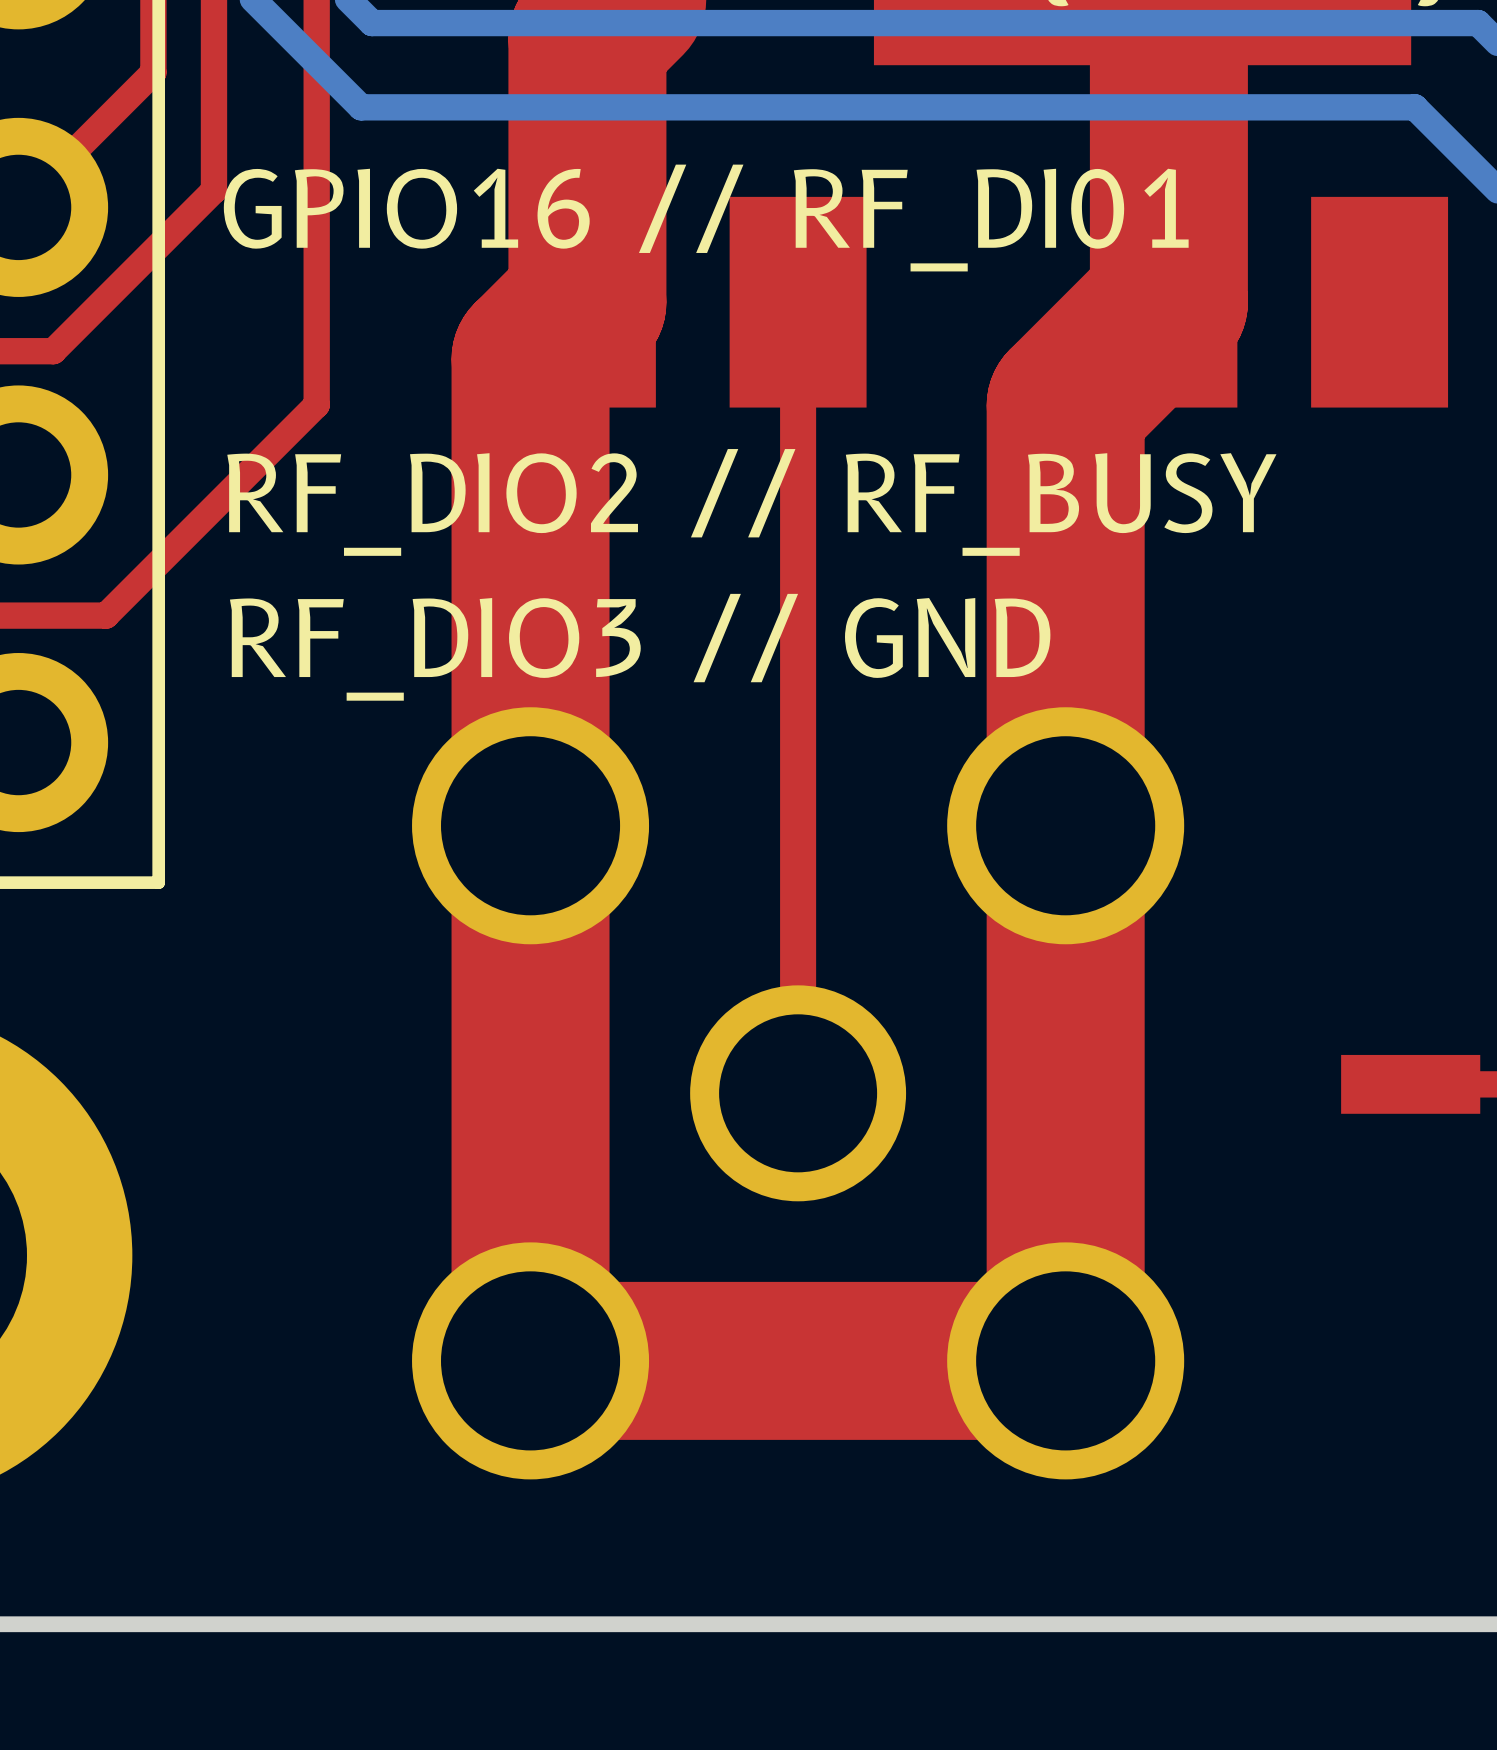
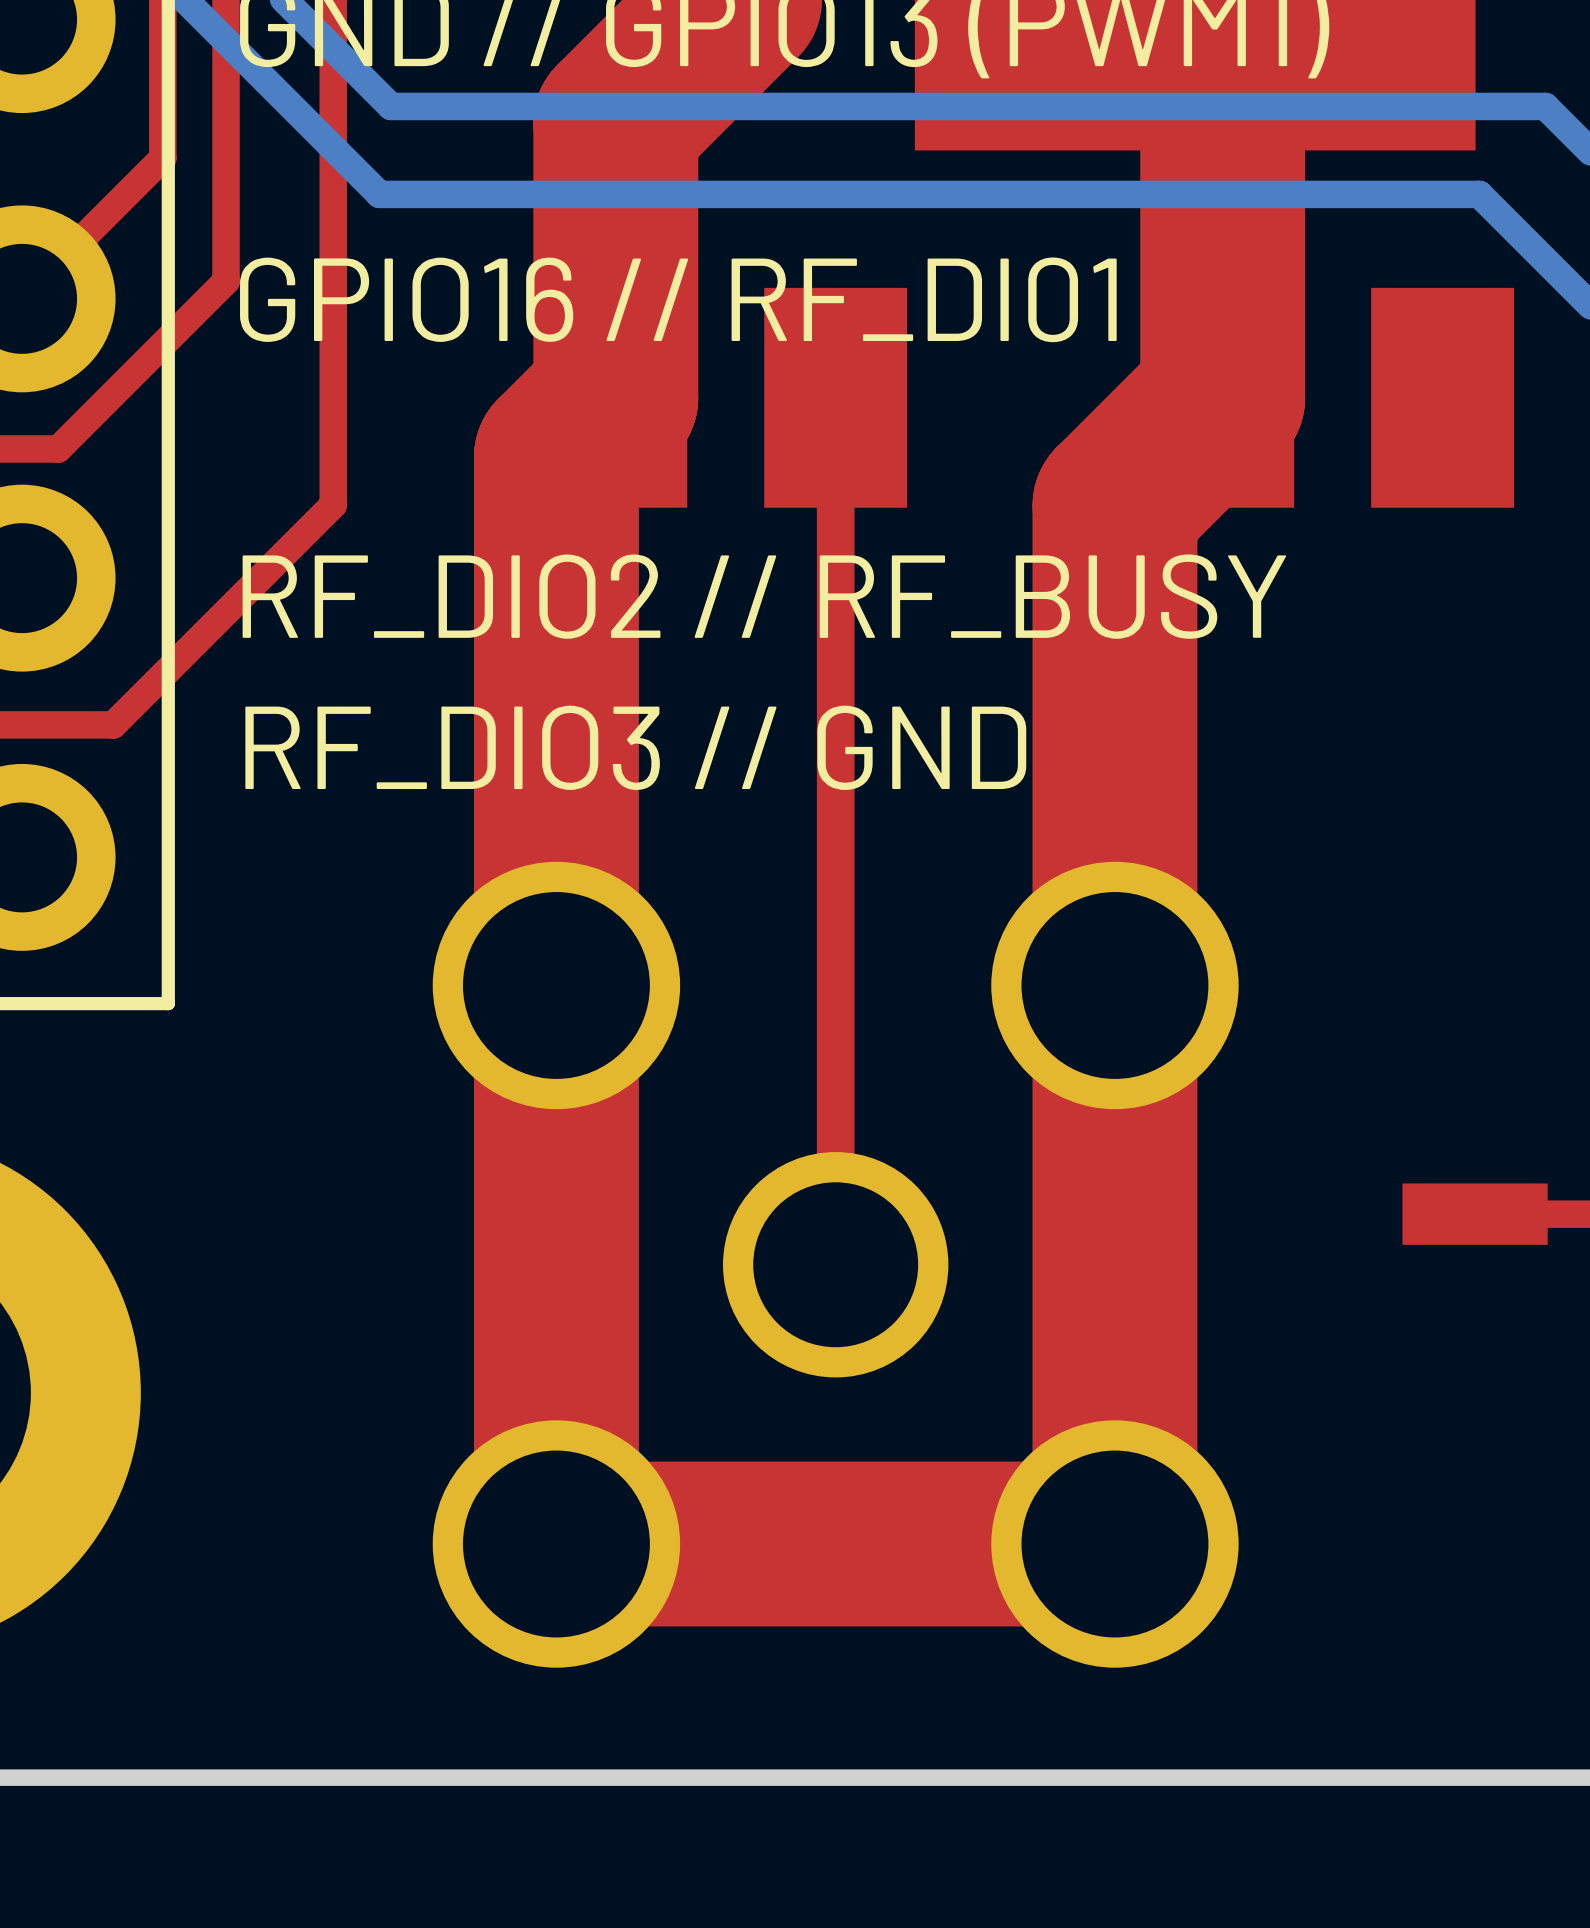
part position: (798, 1093) -> (835, 1264)
top track: (1065, 1360) (530, 1360) -> (1114, 1502) (1114, 1544) (556, 1544) (556, 1502)

